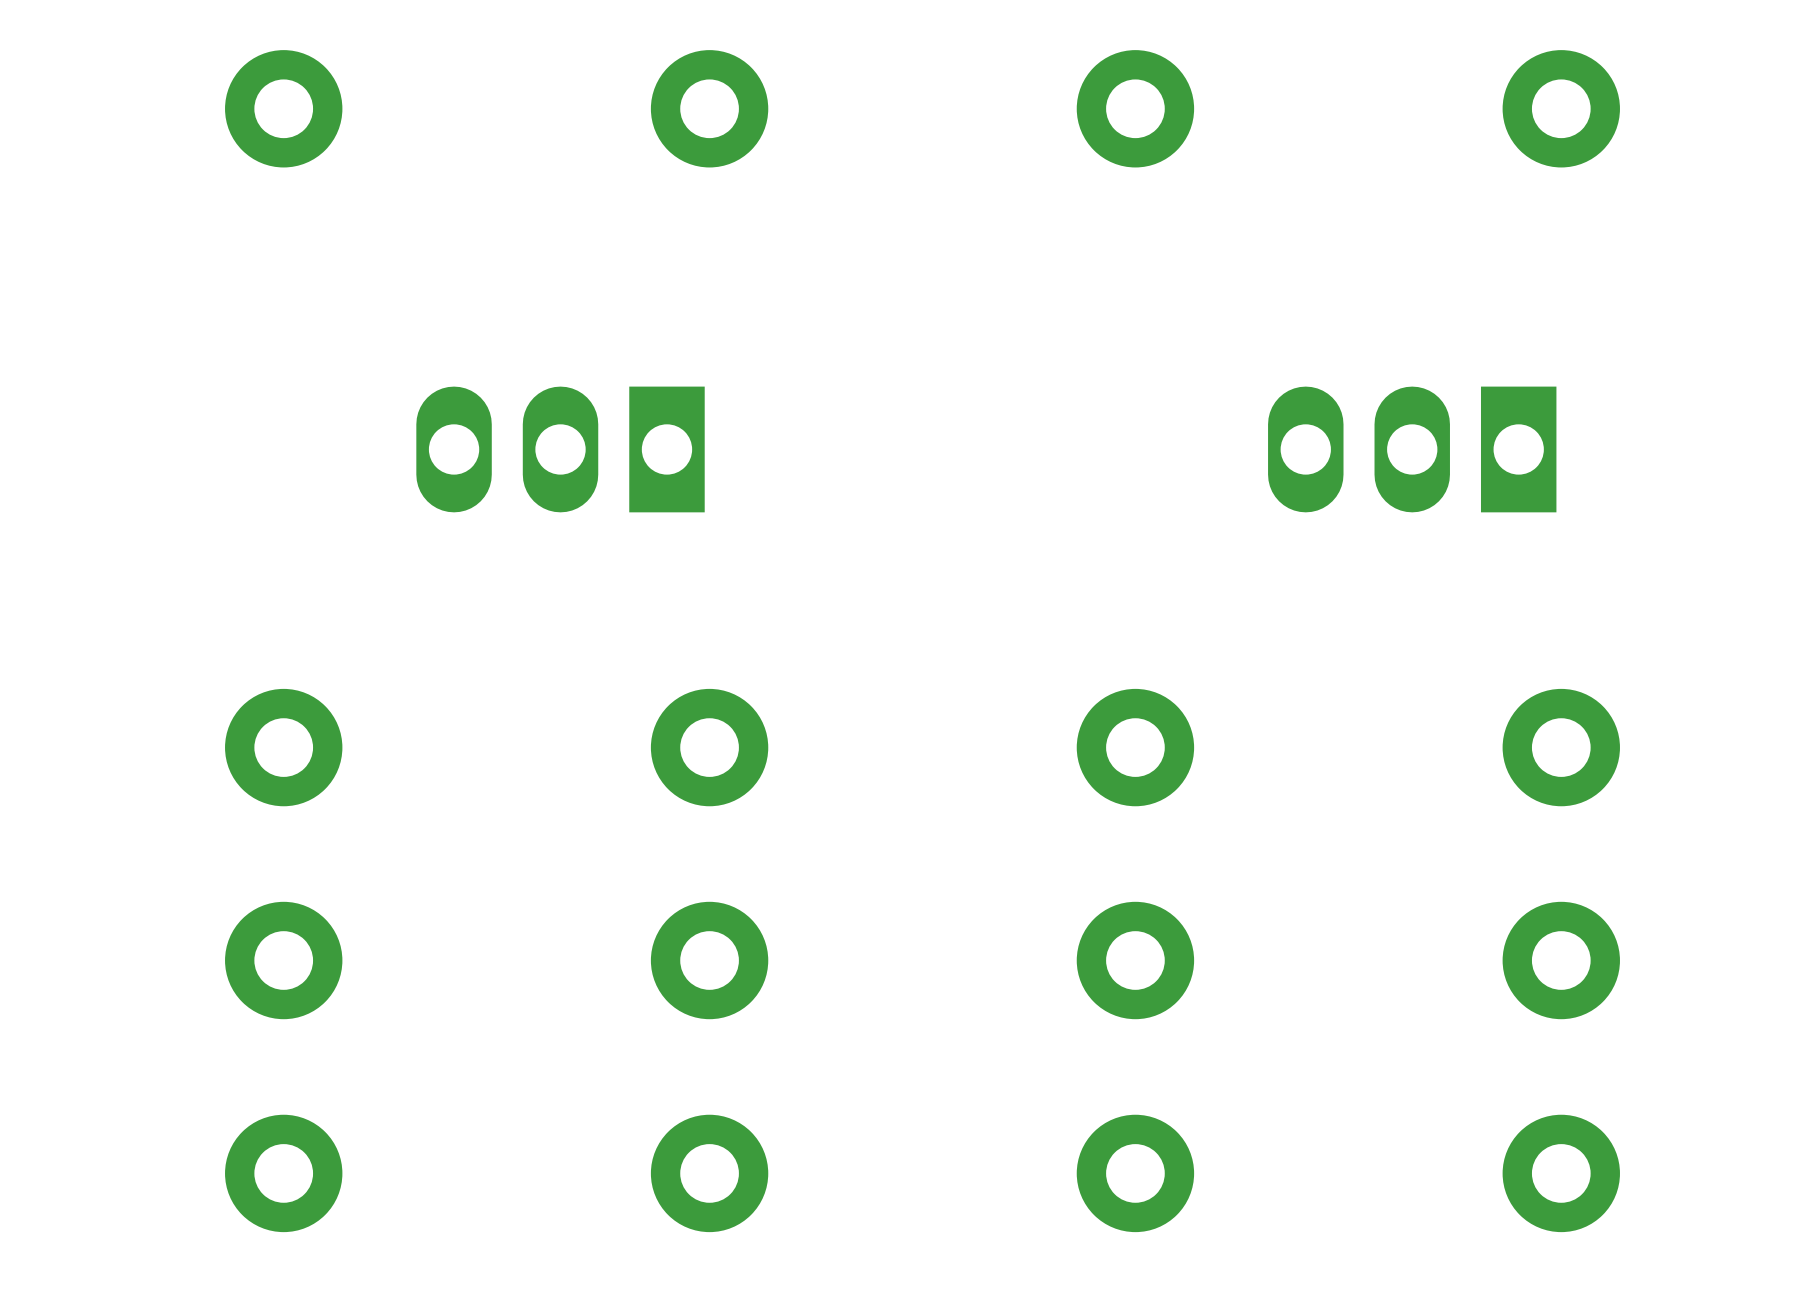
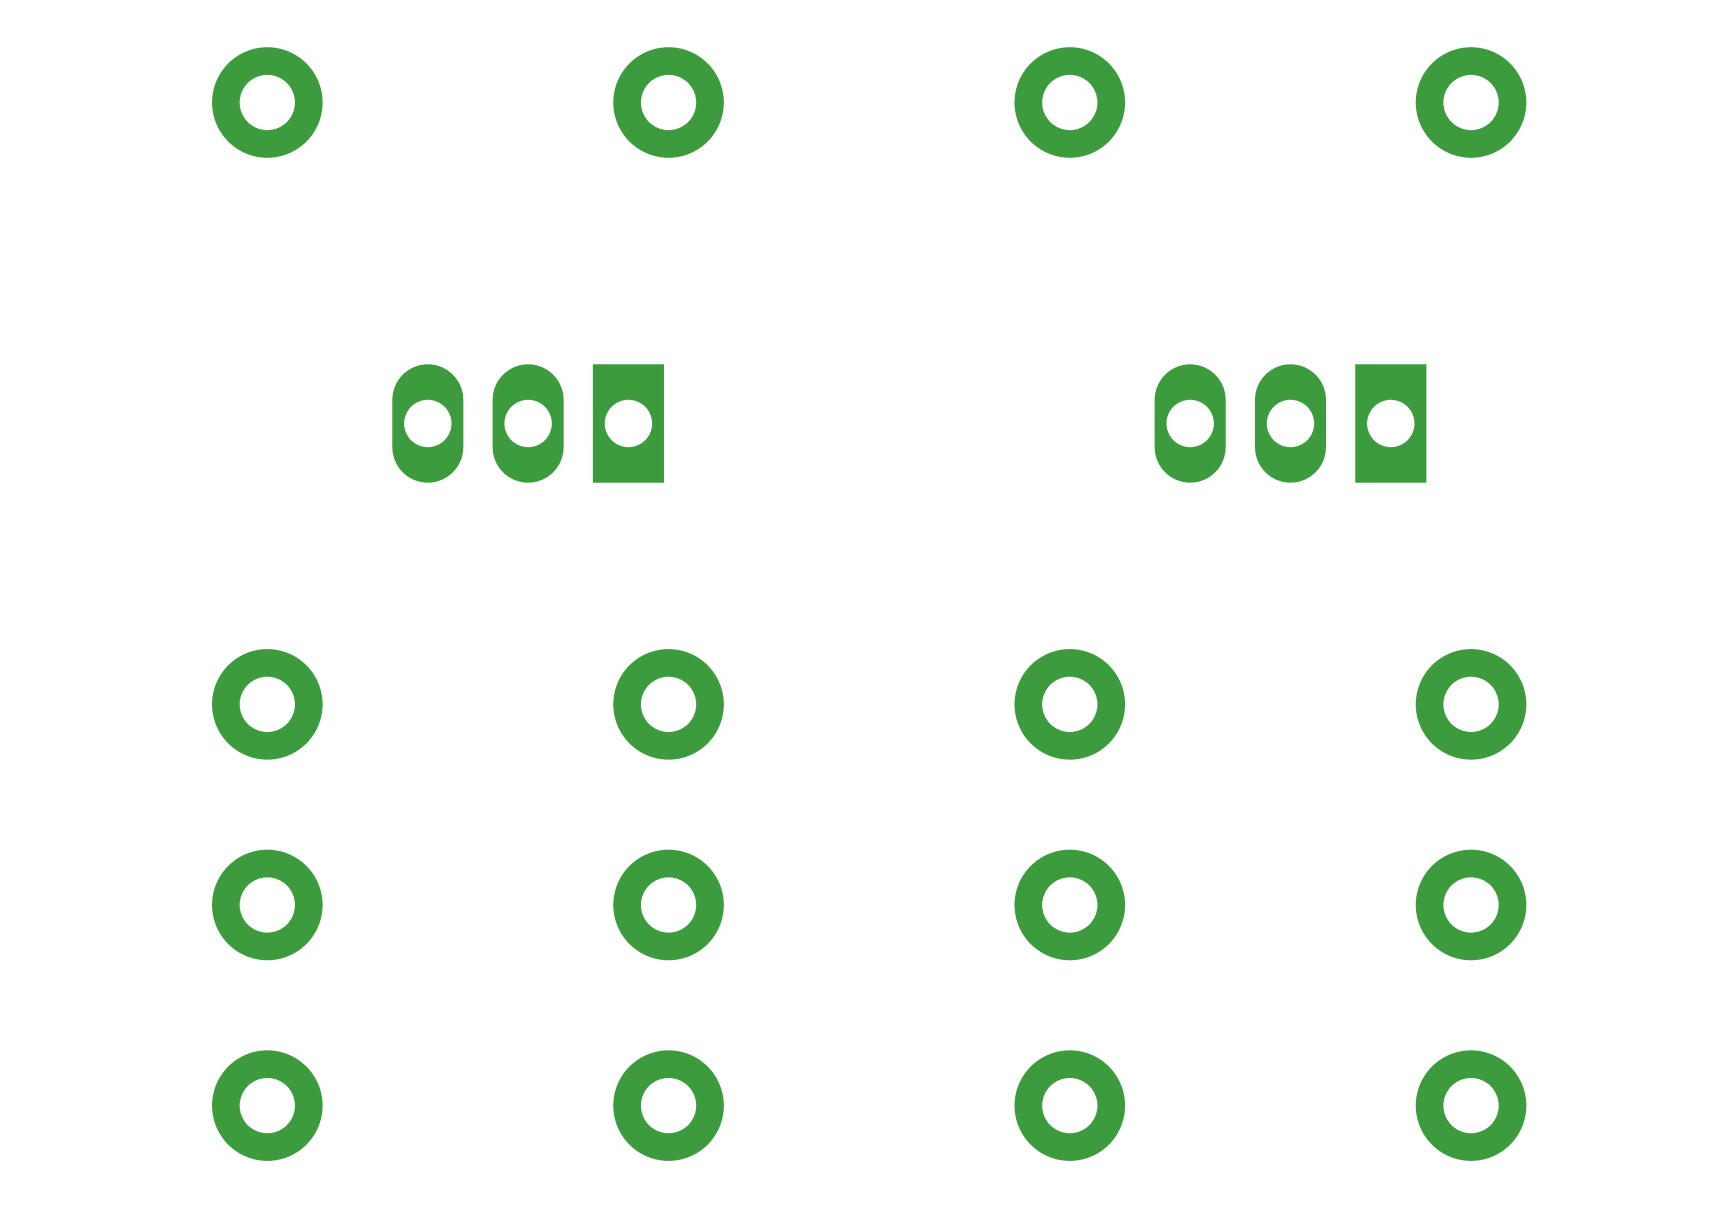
part position: (1412, 449) -> (1290, 423)

